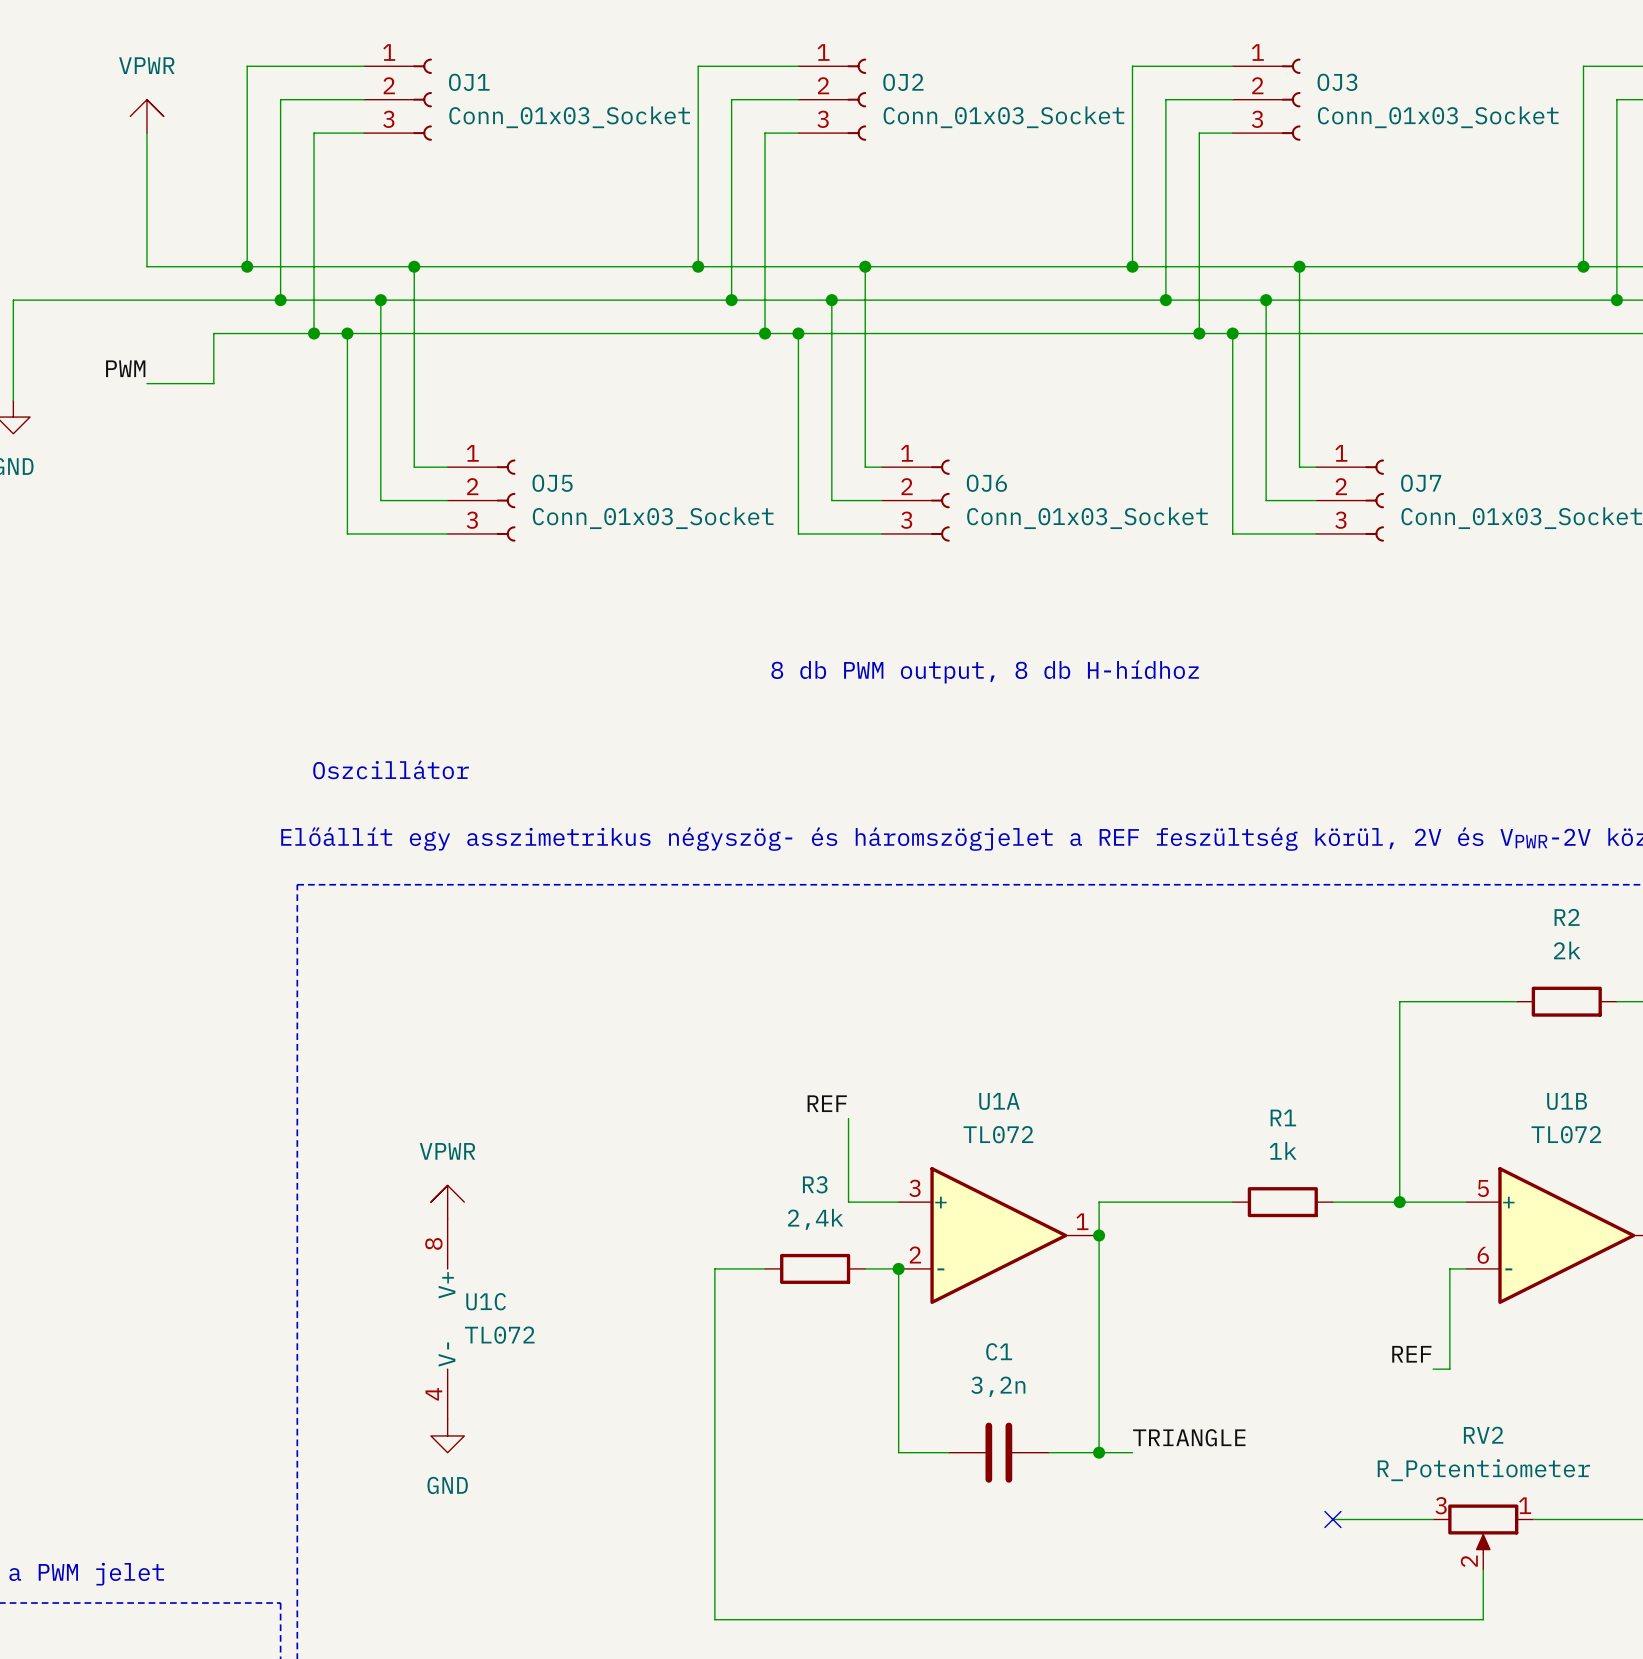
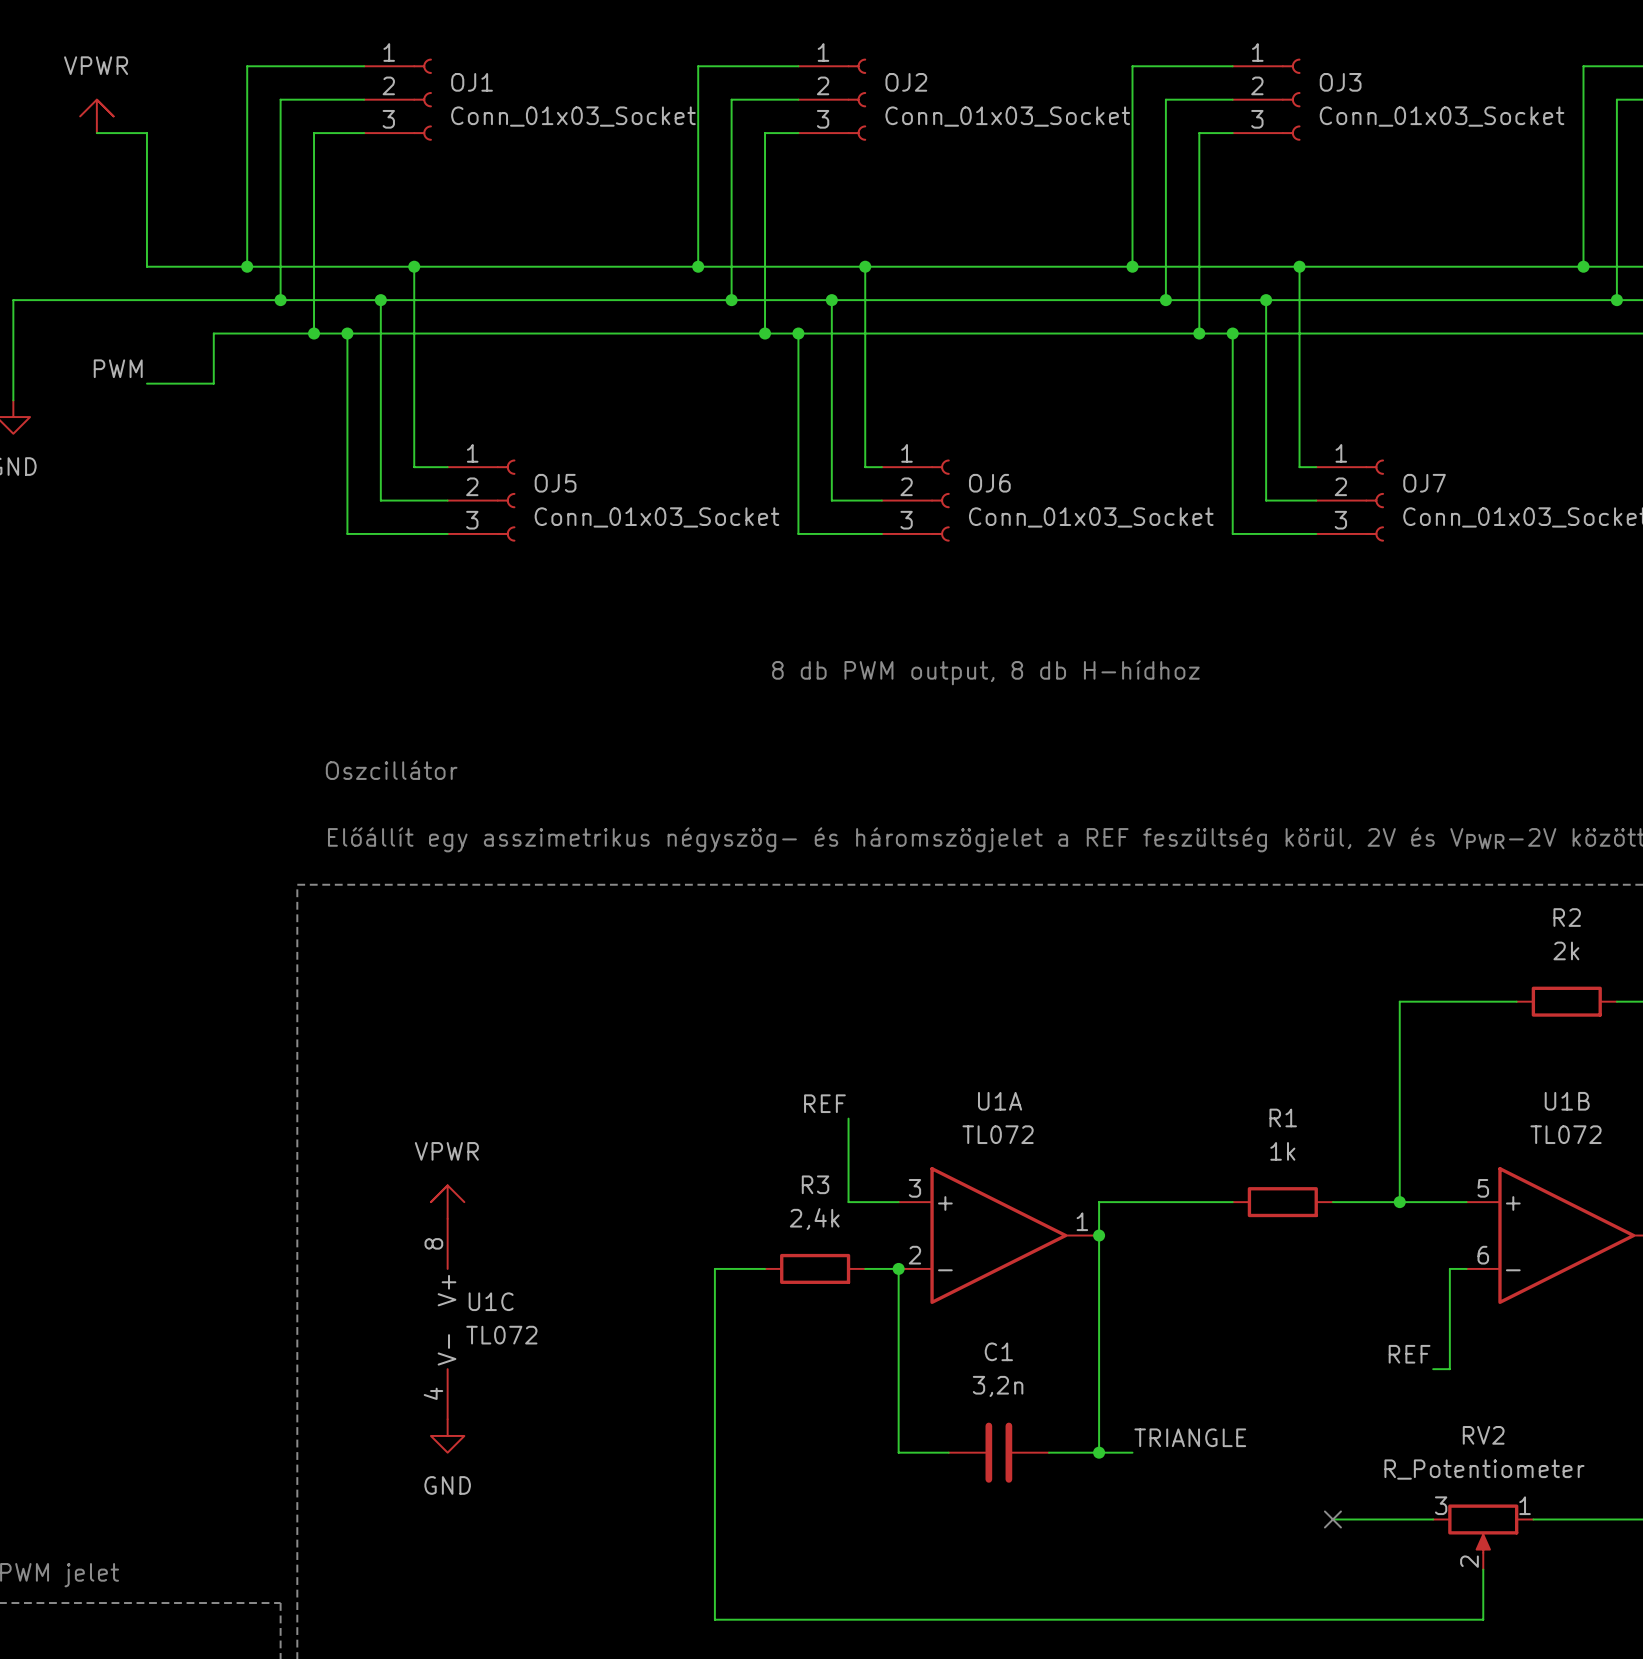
power symbol position: VPWR (146, 116) -> VPWR (96, 116)
wire: none -> (96, 133) (146, 133)

